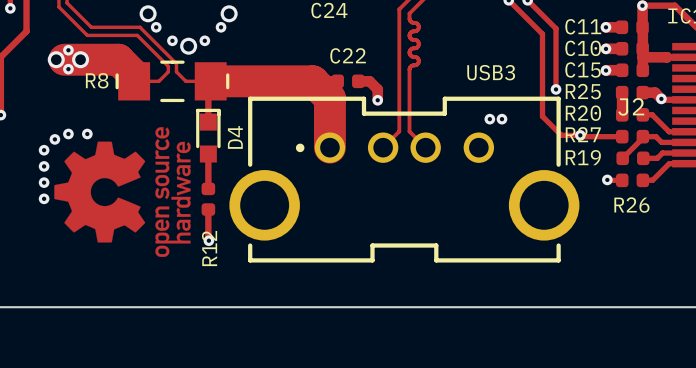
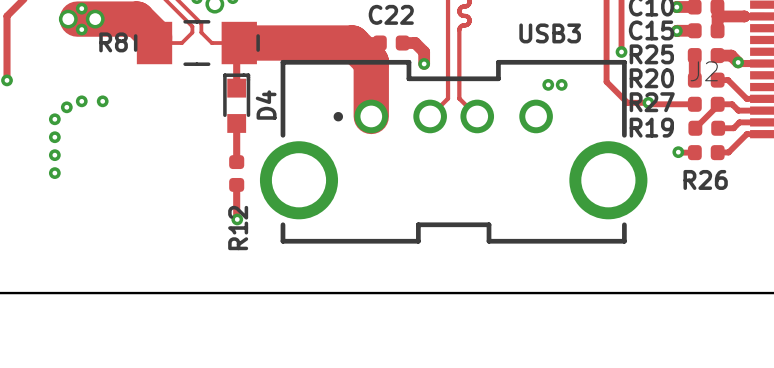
drawing: [54, 127, 191, 258] -> none

